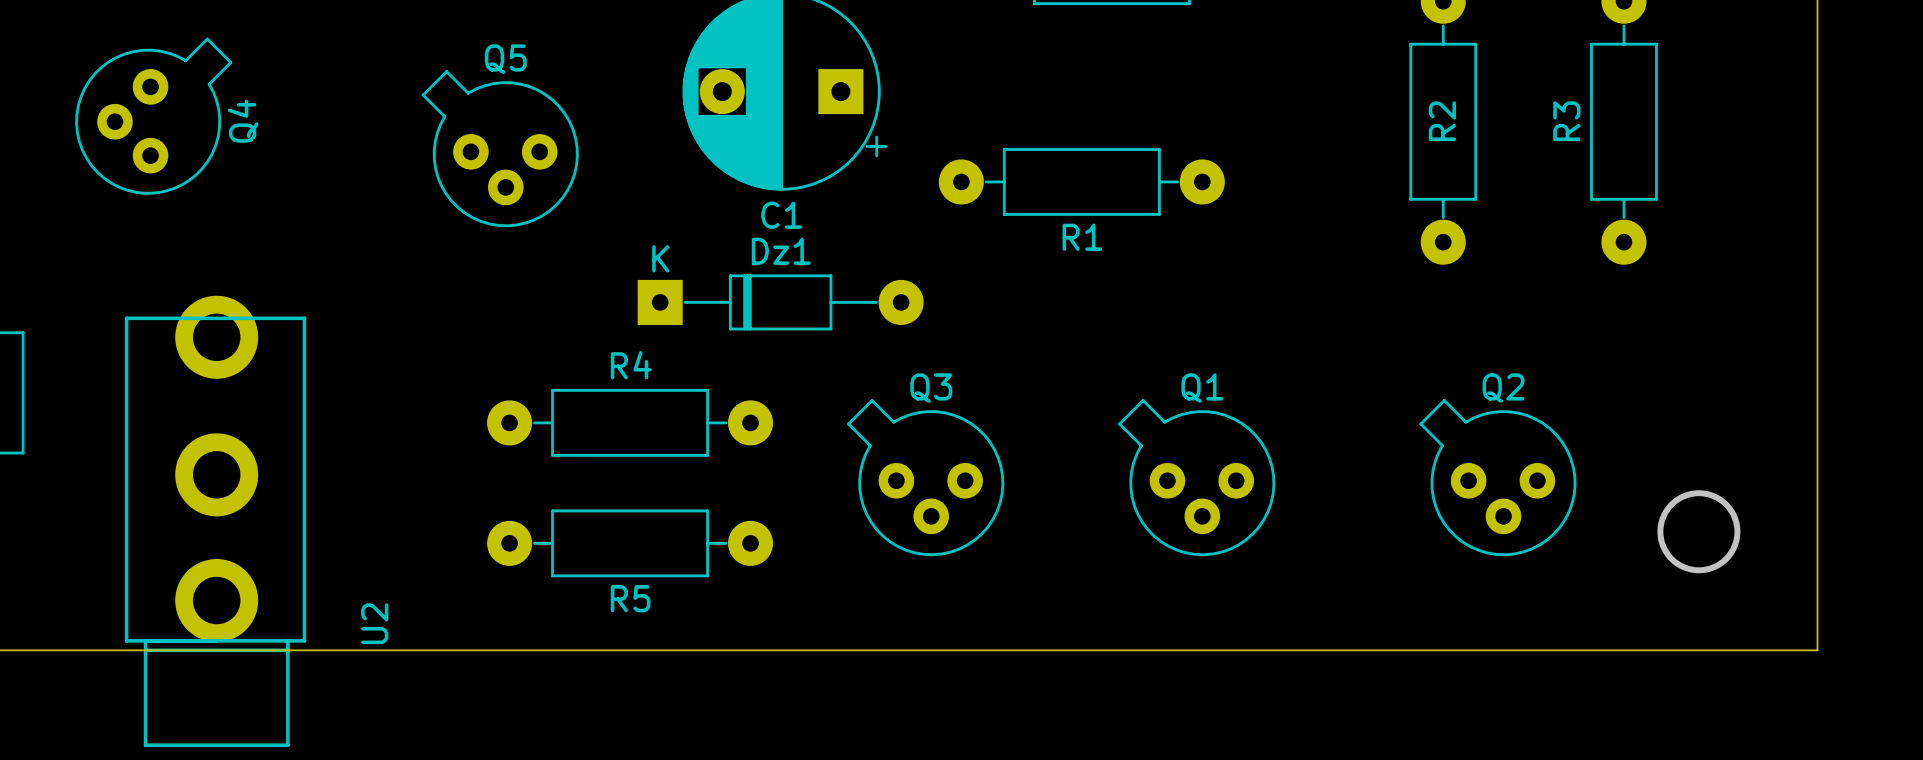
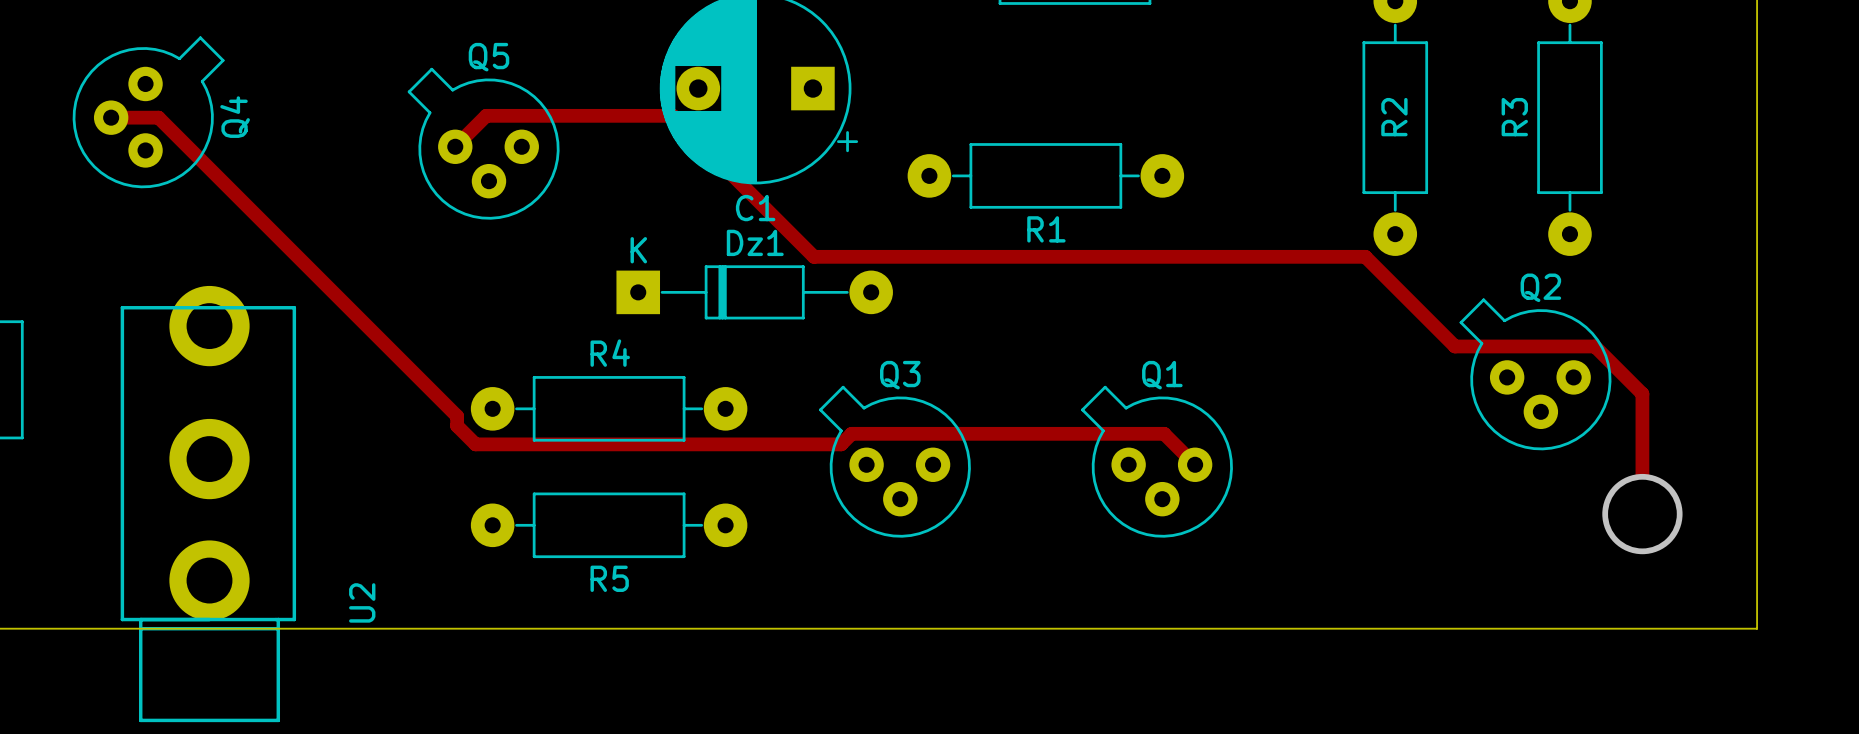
track: none -> (111, 117) (158, 117) (457, 416) (457, 425) (475, 444) (841, 444) (851, 433) (1164, 433) (1195, 464)
track: none -> (455, 146) (486, 115) (672, 115) (813, 256) (1365, 256) (1455, 346) (1594, 346) (1642, 393) (1642, 514)
Q2 position: (1497, 477) -> (1535, 374)

